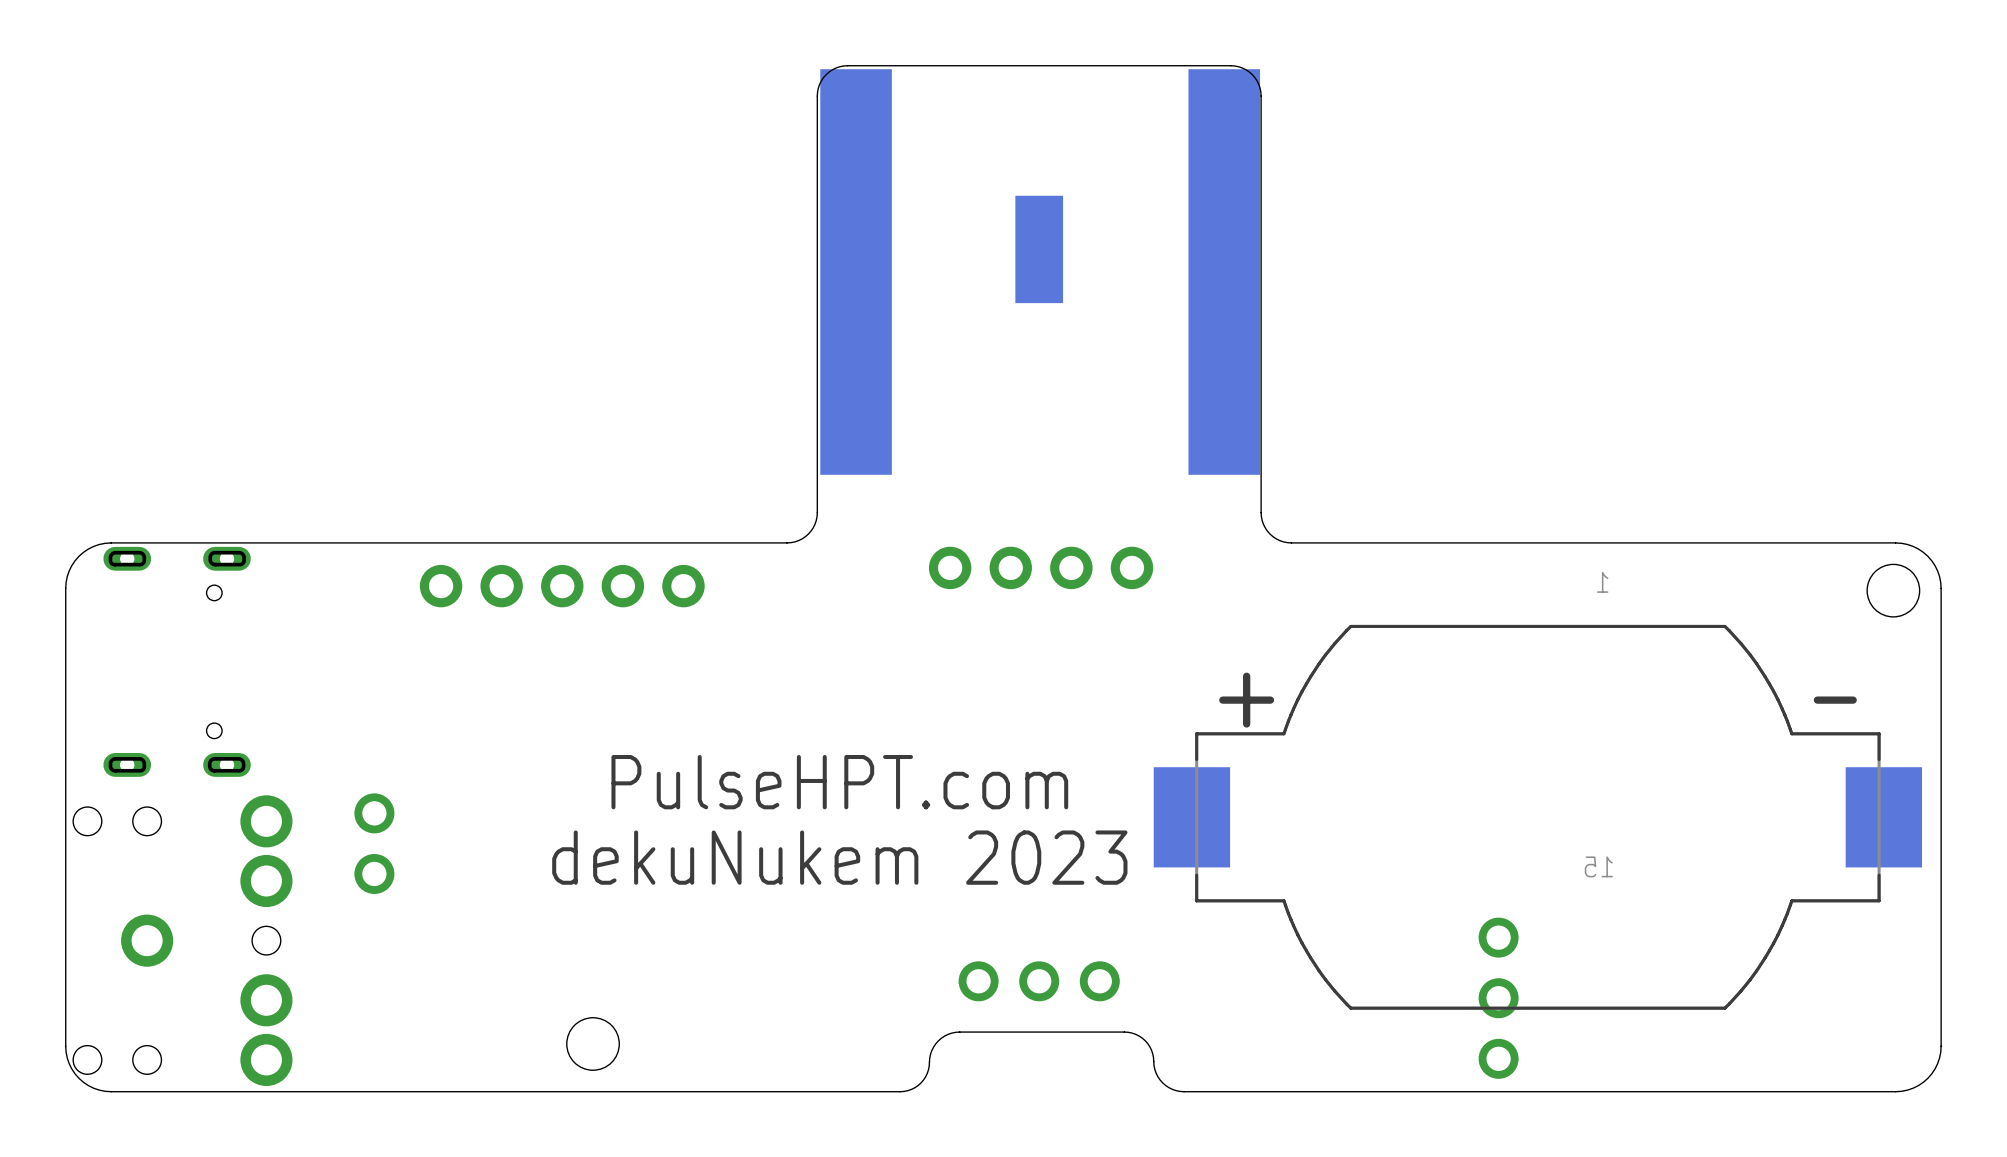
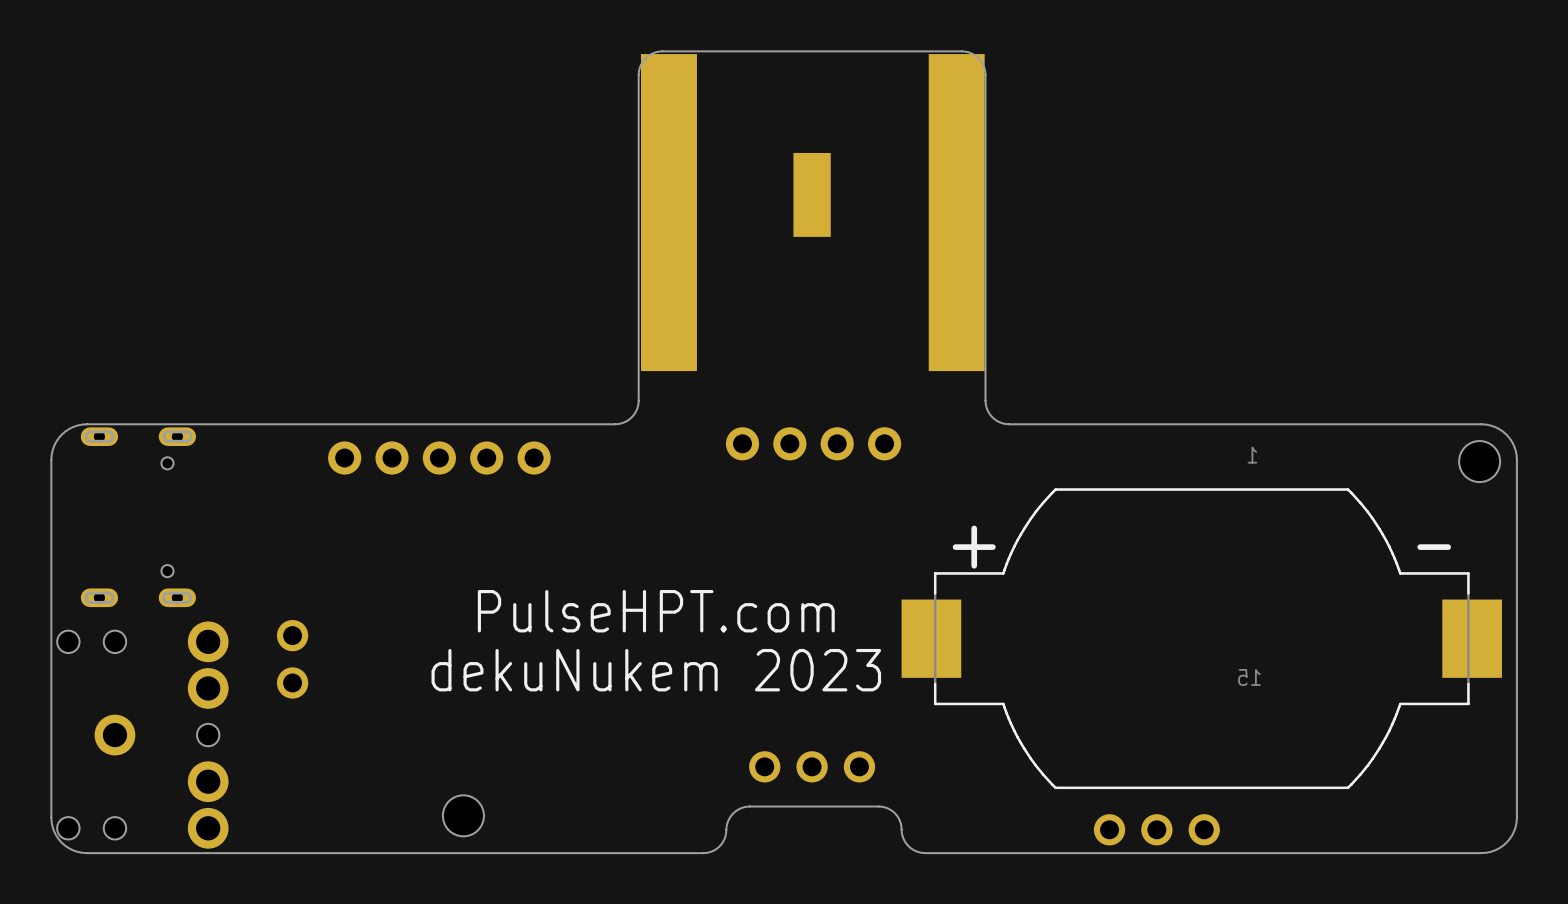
part rotation: 0° (1498, 998) -> 90° clockwise (1156, 829)

